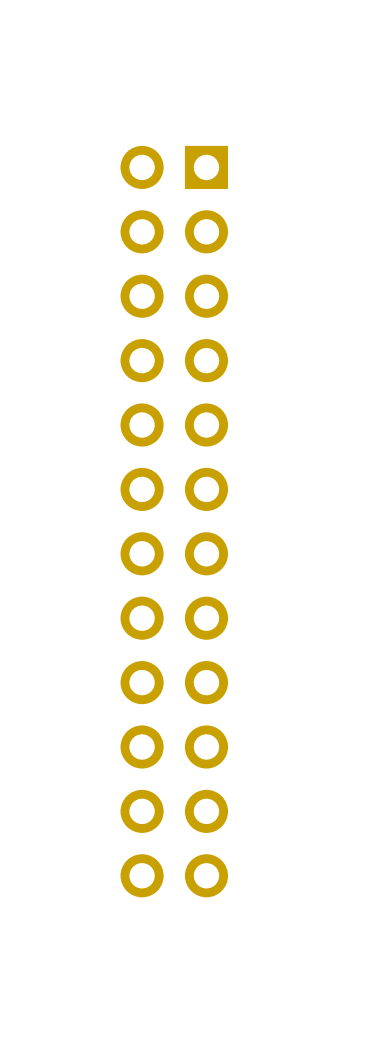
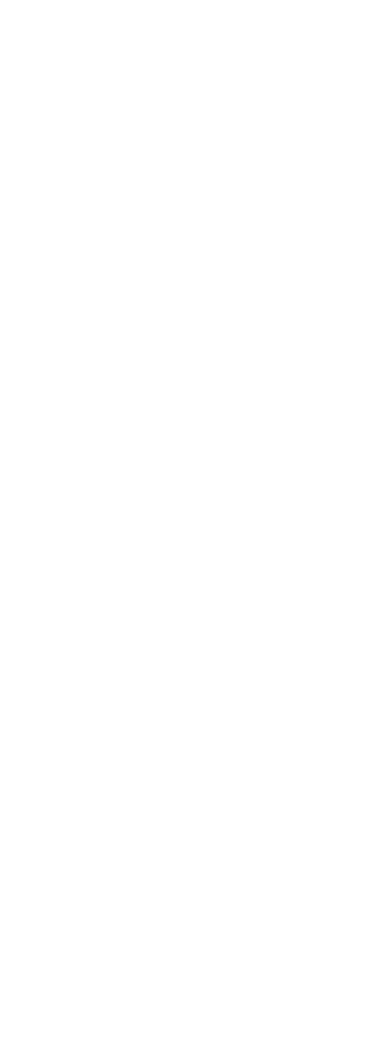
part: (174, 521) -> none

